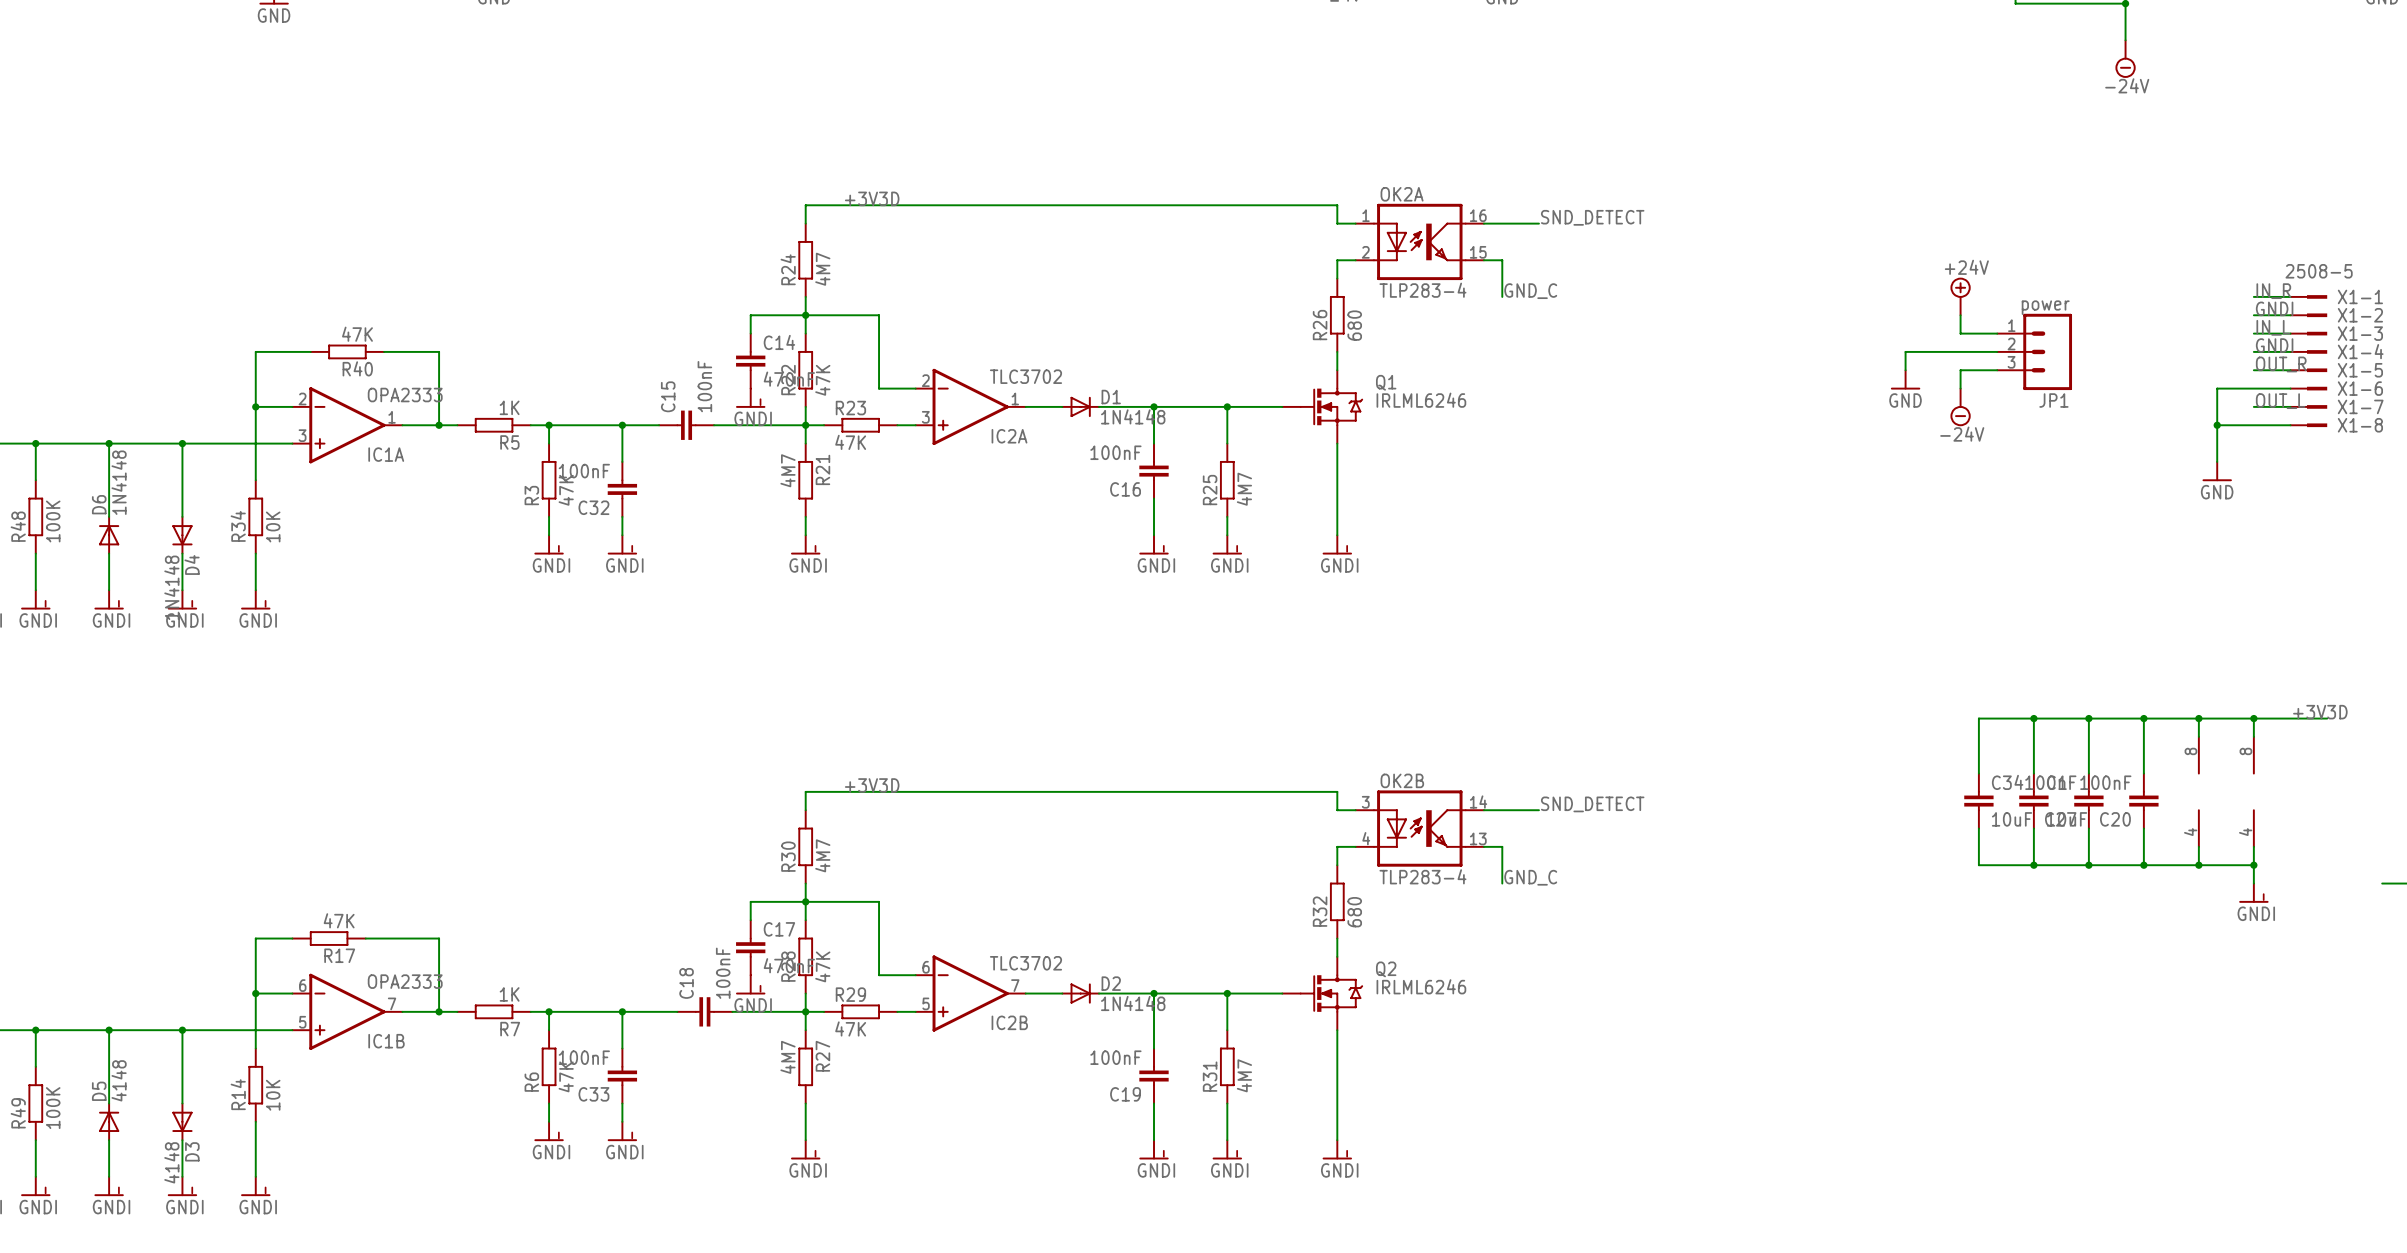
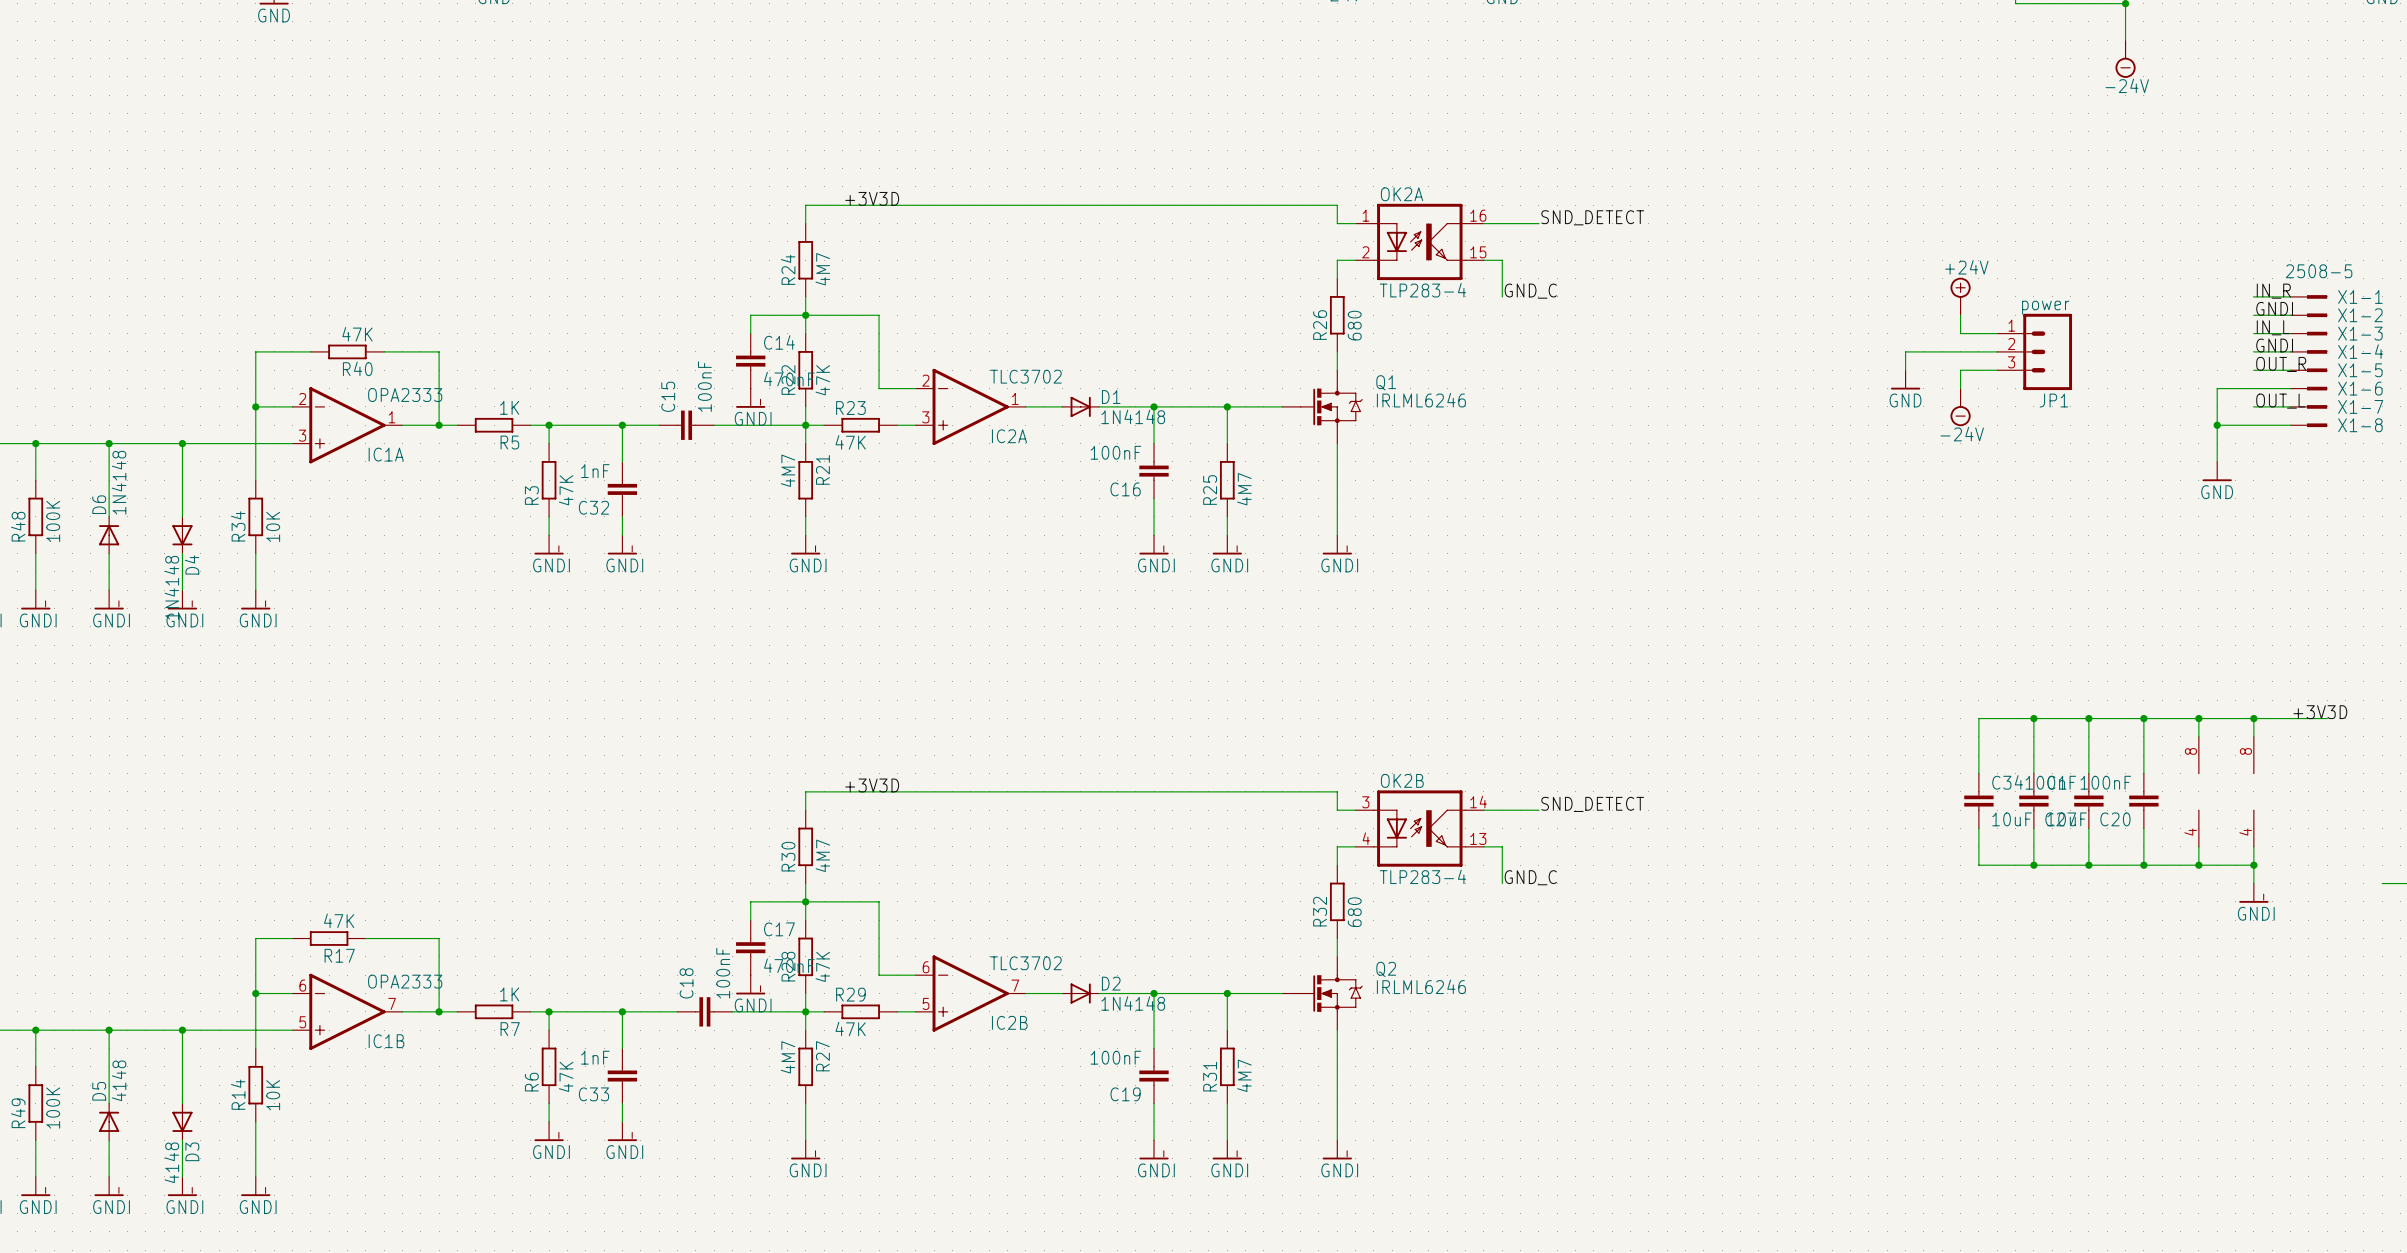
C32 value: 100nF (584, 471) -> 1nF (595, 471)
C33 value: 100nF (584, 1057) -> 1nF (595, 1057)

